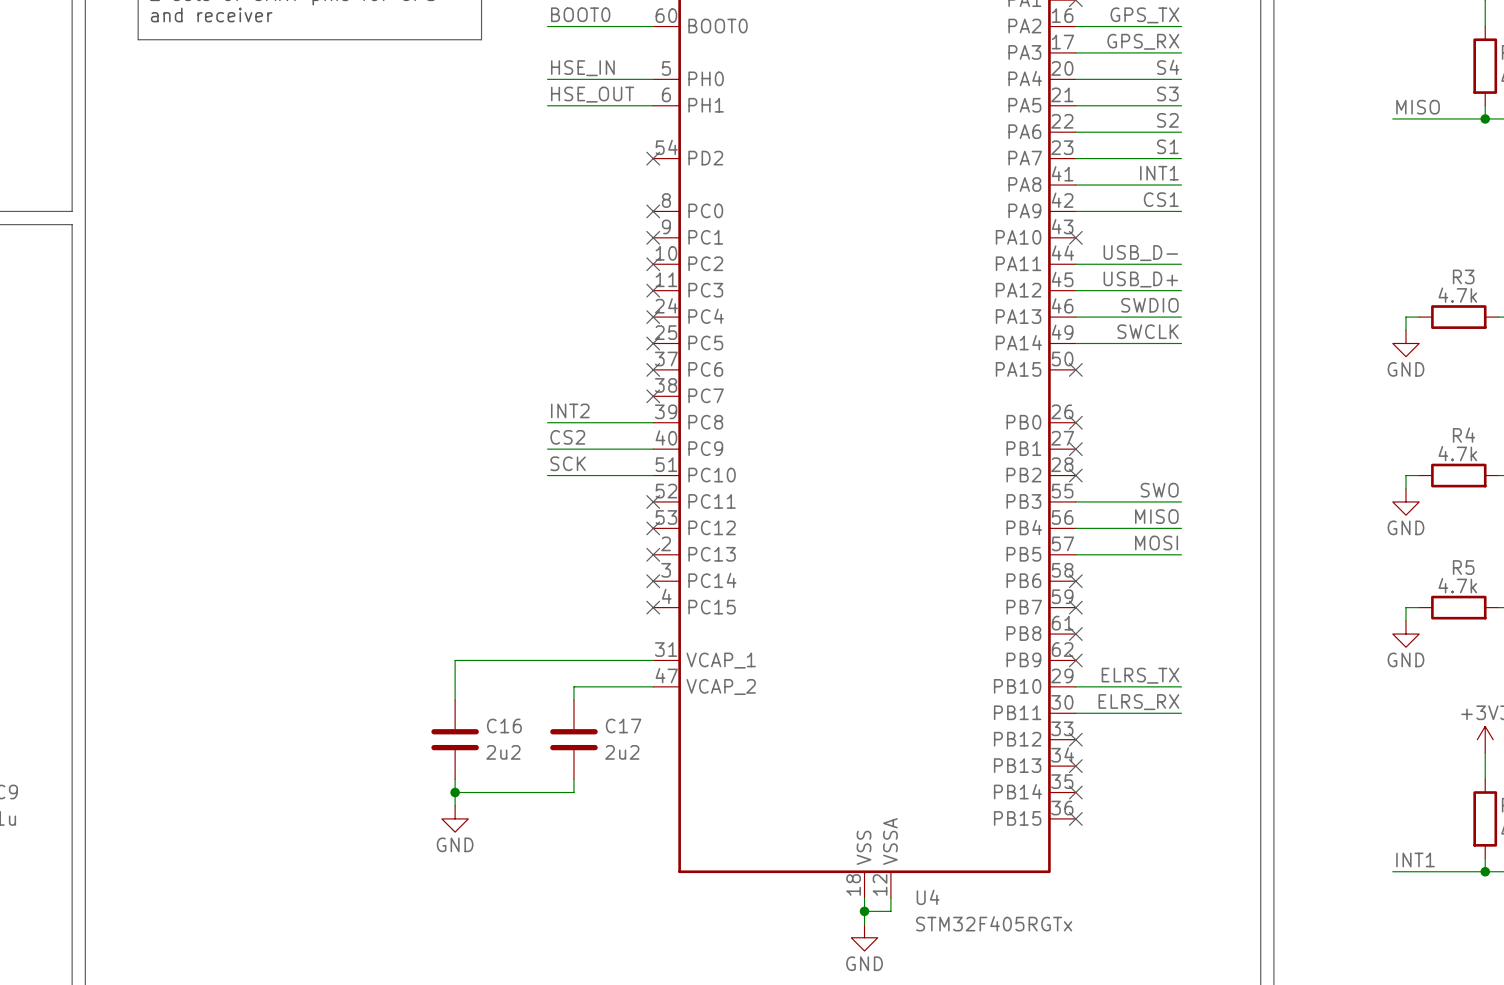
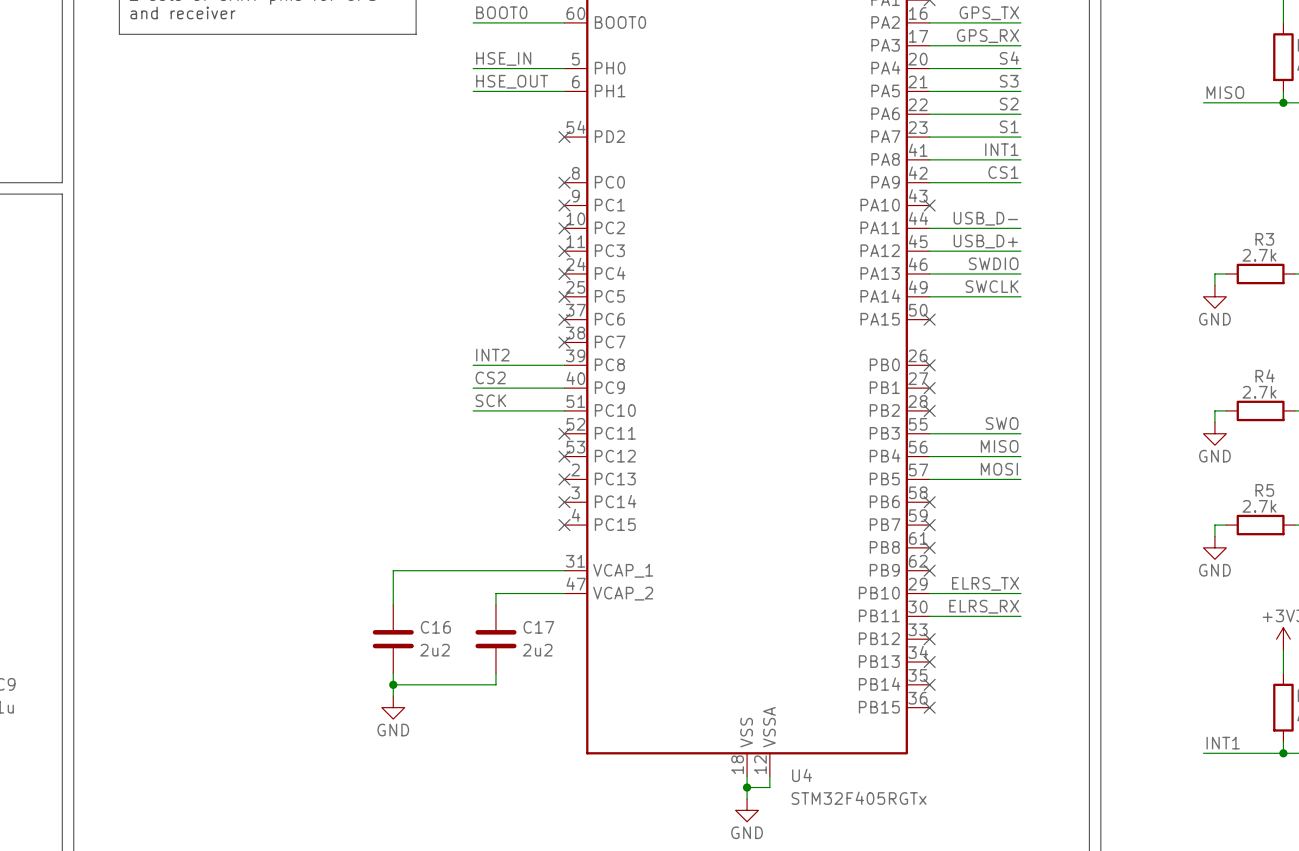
R3 value: 4.7k (1457, 295) -> 2.7k (1259, 255)
R4 value: 4.7k (1457, 453) -> 2.7k (1259, 392)
R5 value: 4.7k (1457, 585) -> 2.7k (1259, 506)

